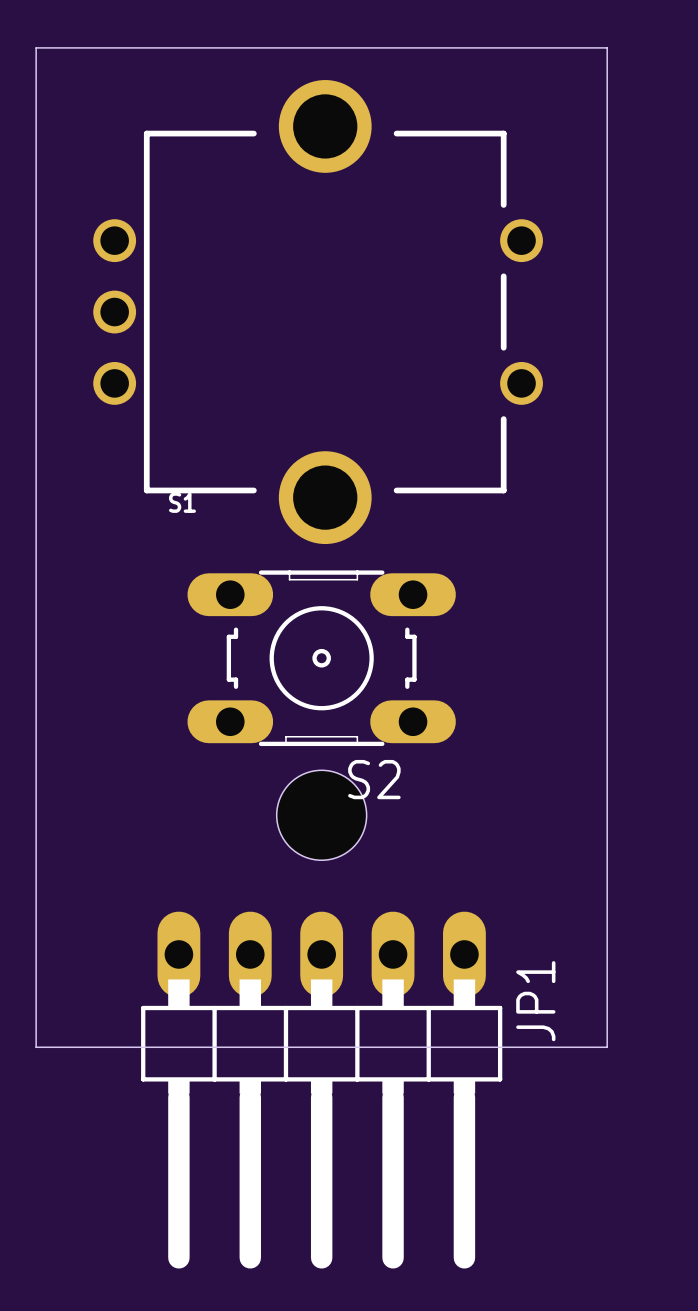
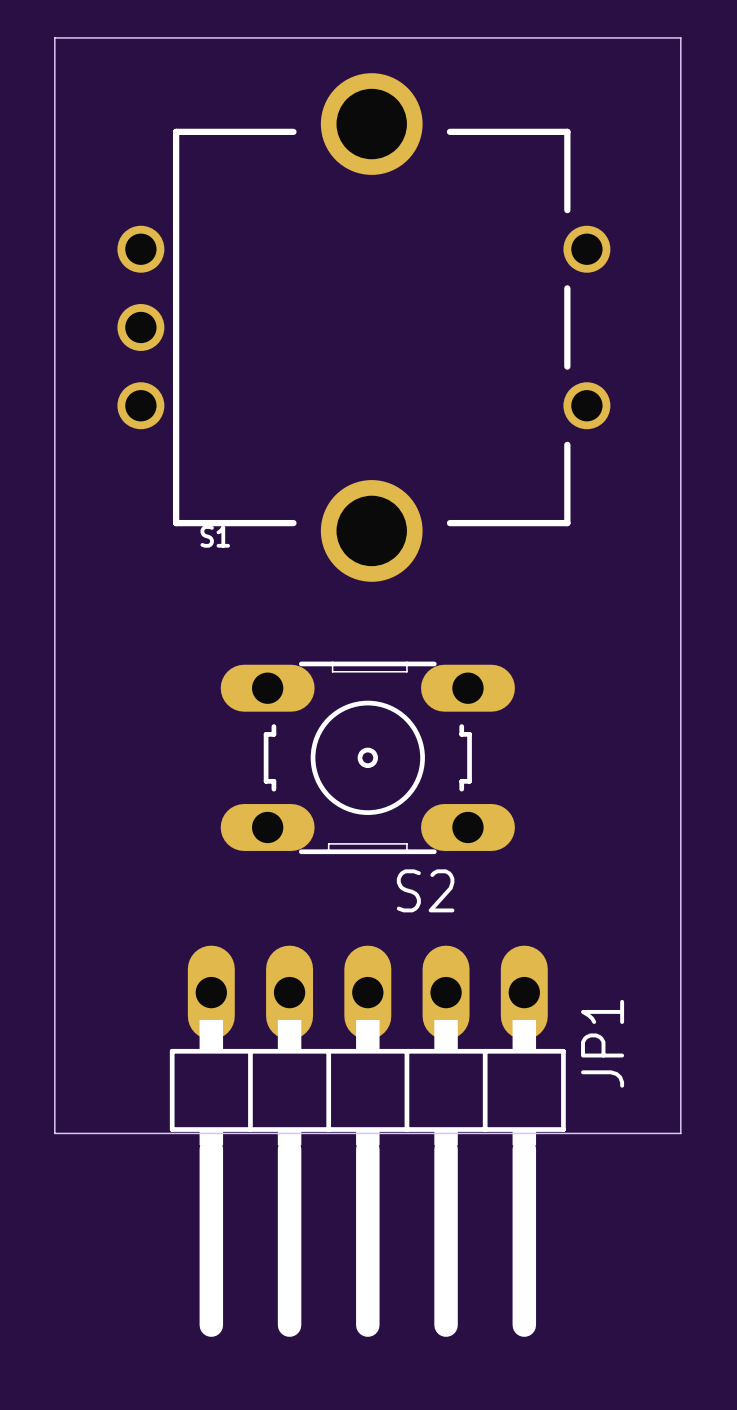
S2 position: (321, 658) -> (367, 757)
hole: (321, 815) -> none
JP1 position: (321, 1090) -> (367, 1141)

